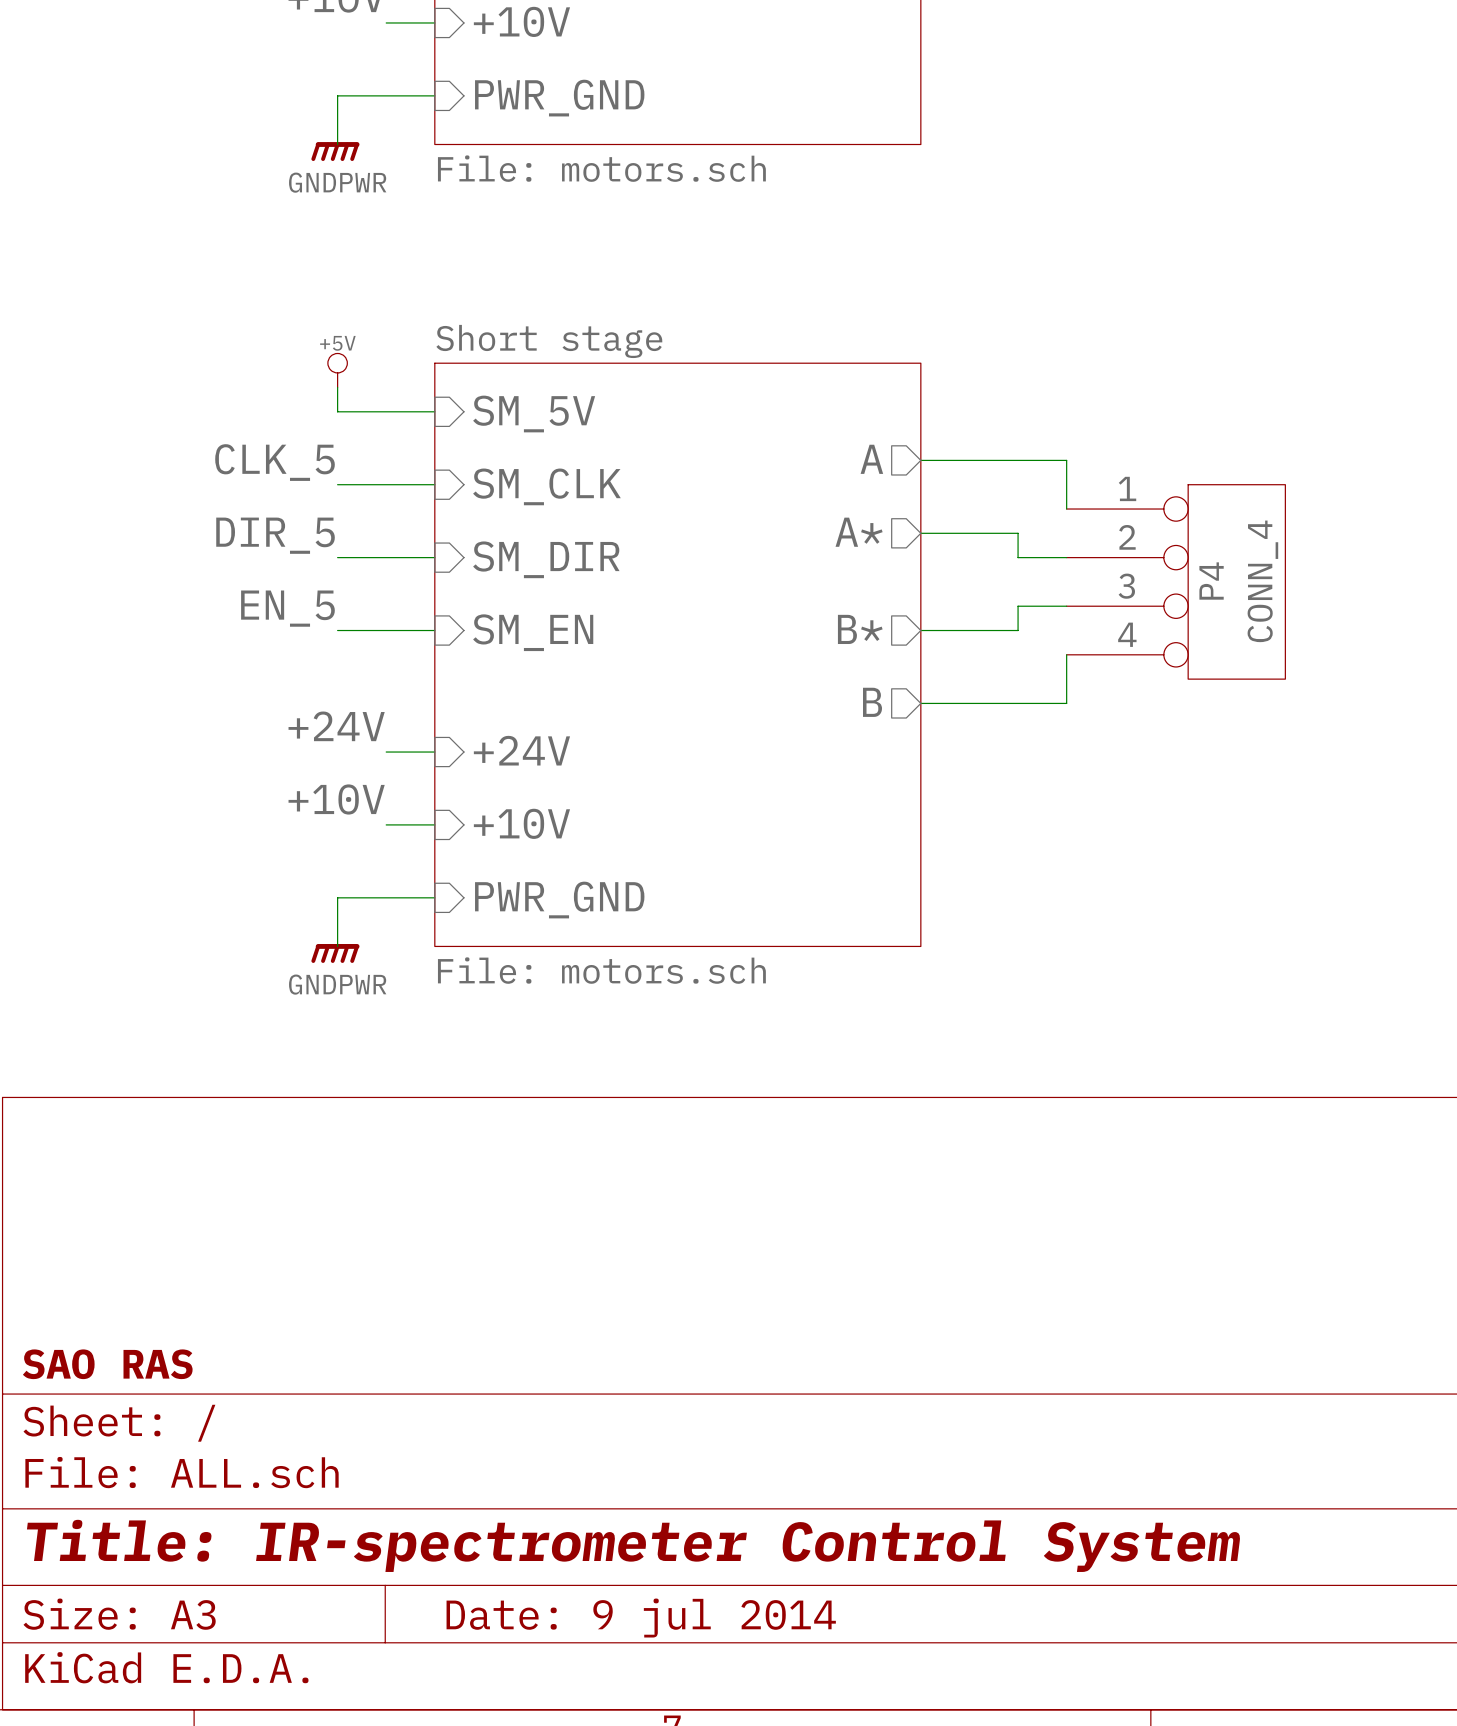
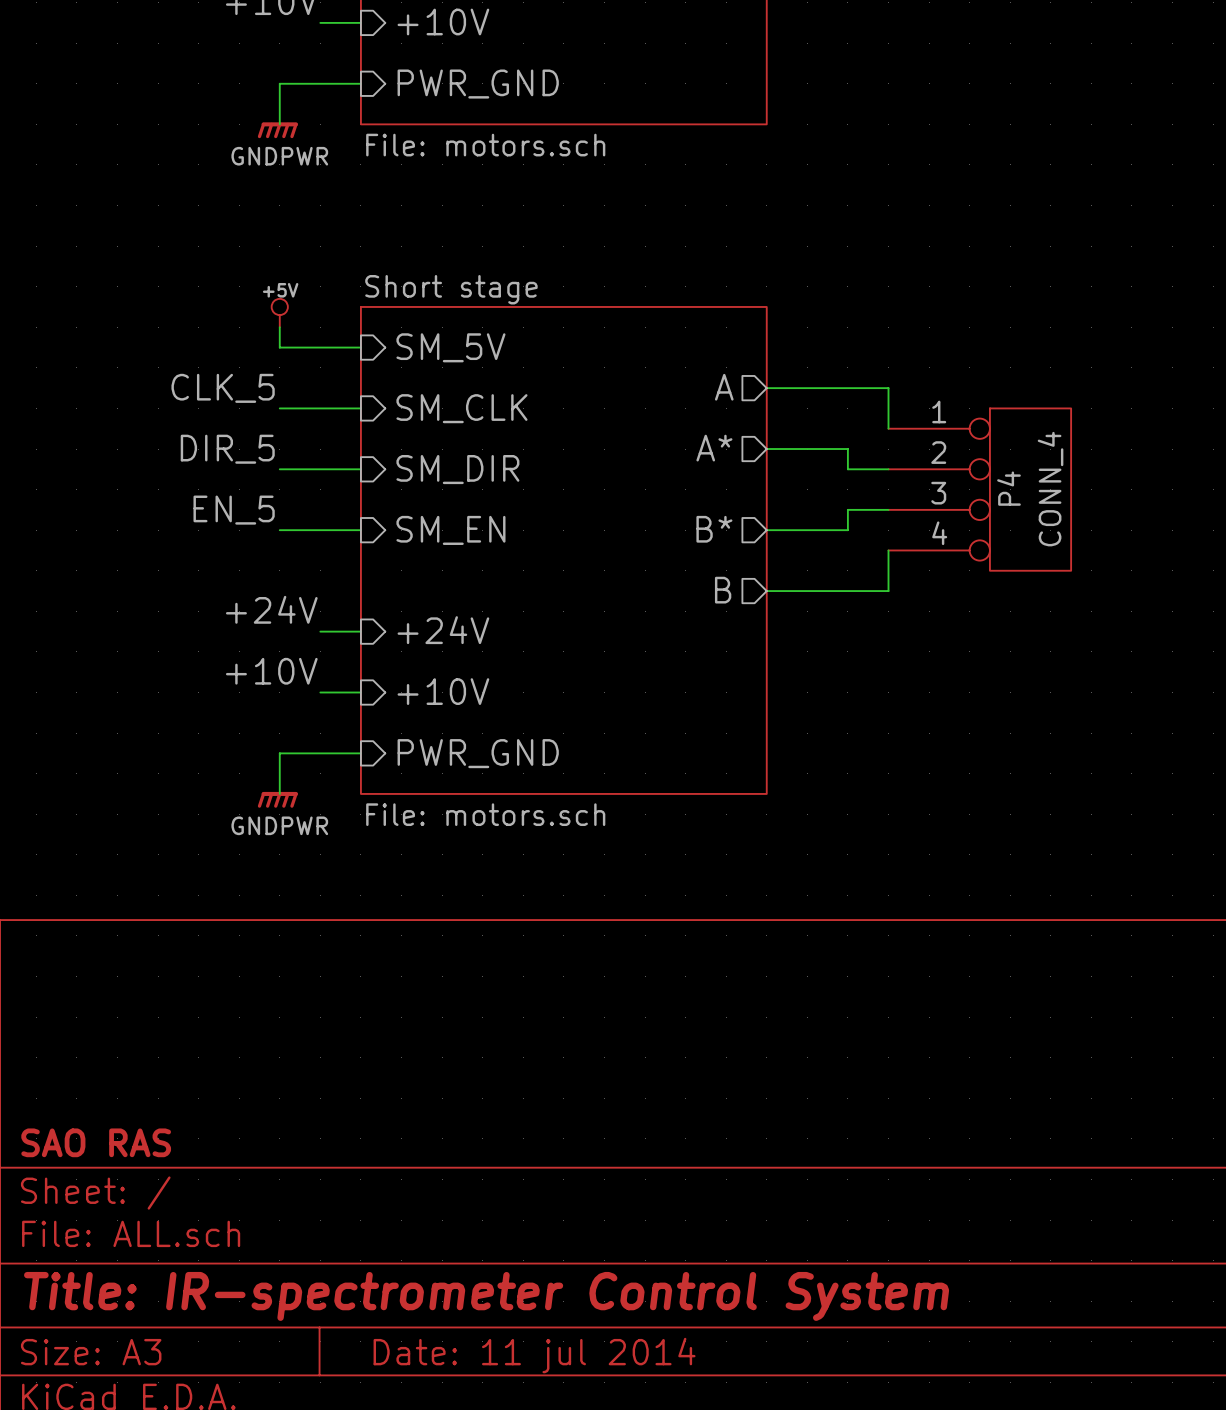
title block: Date: 9 jul 2014 (641, 1618) -> Date: 11 jul 2014 (534, 1355)

